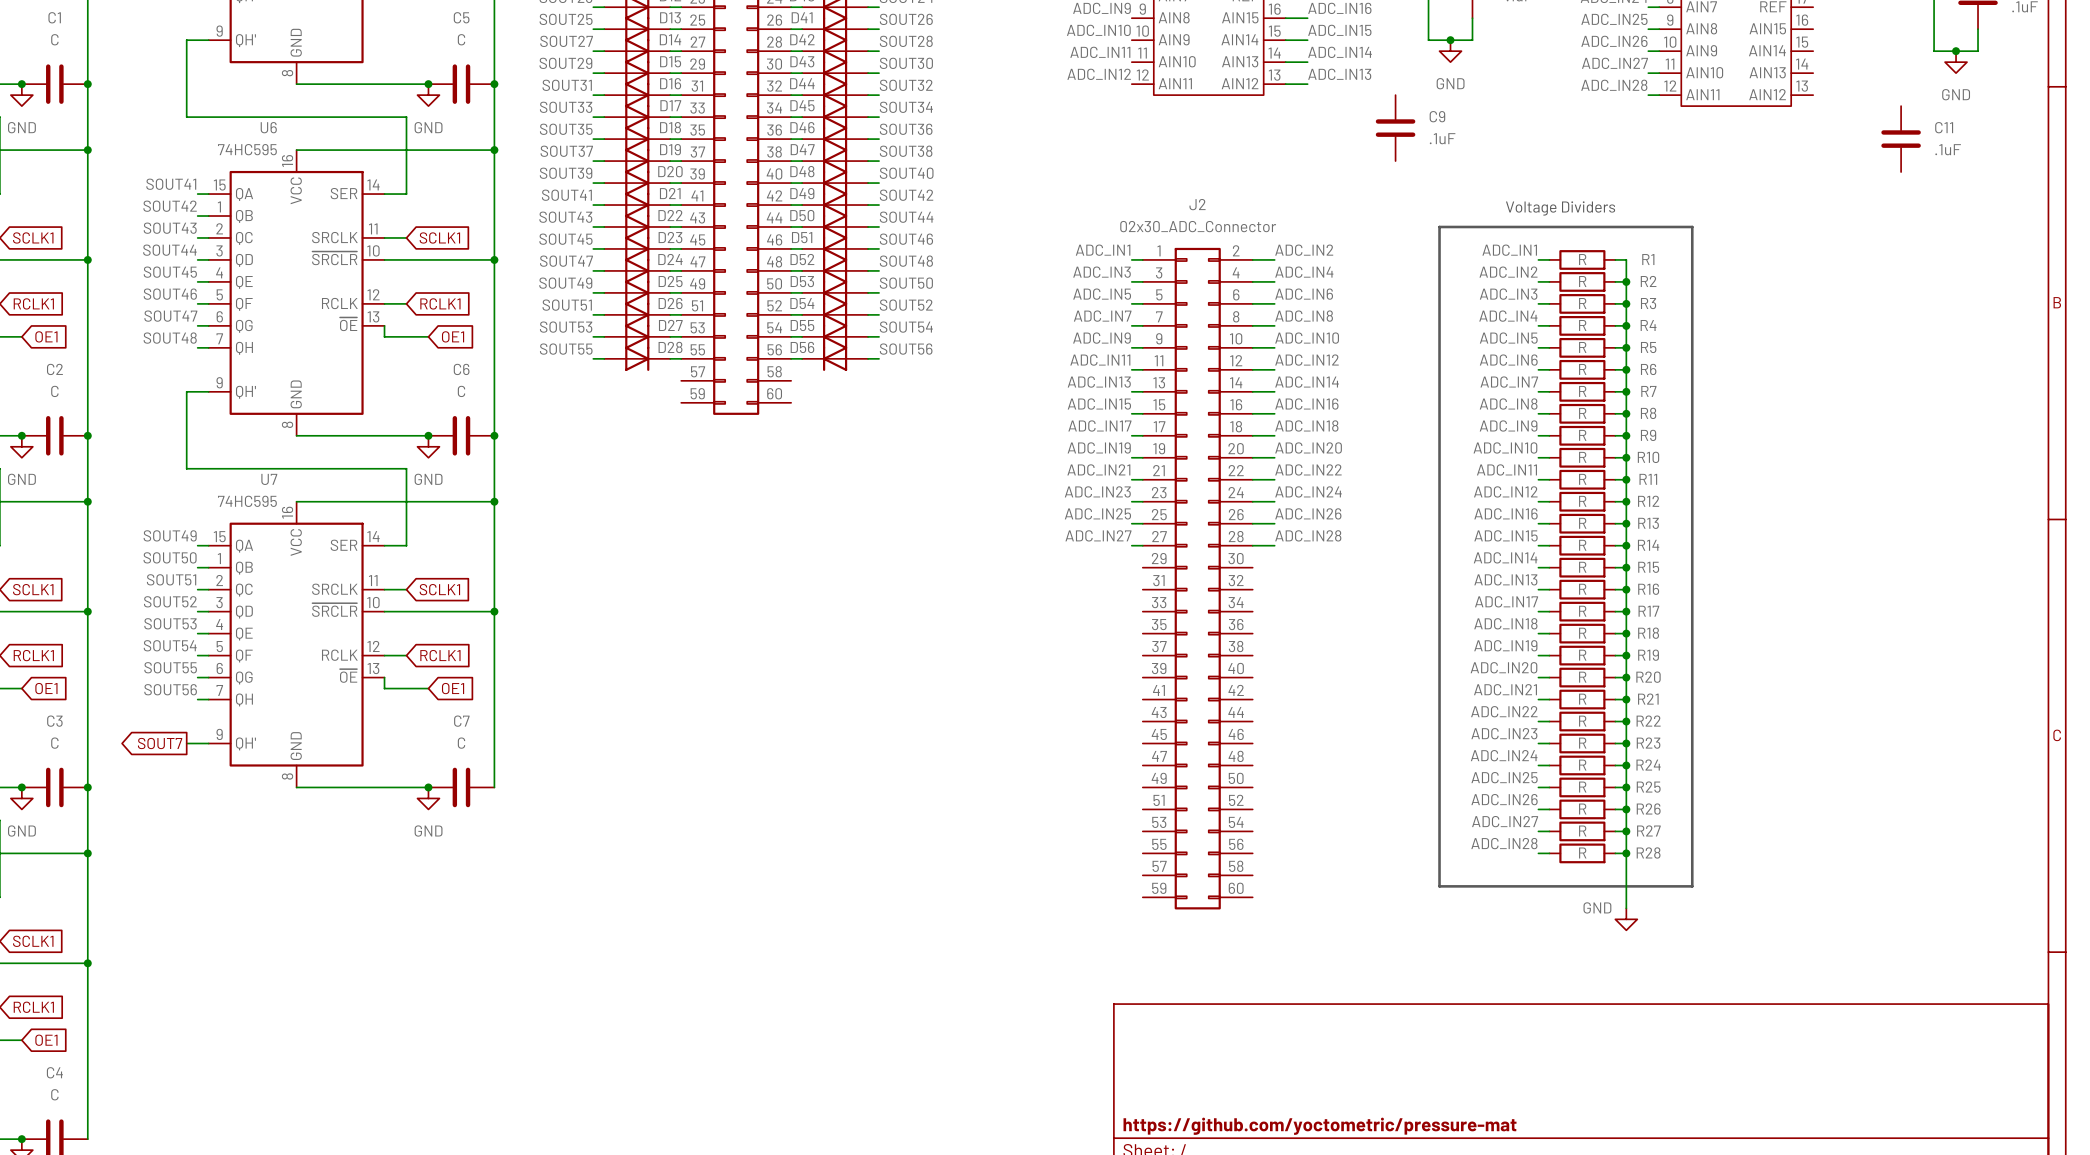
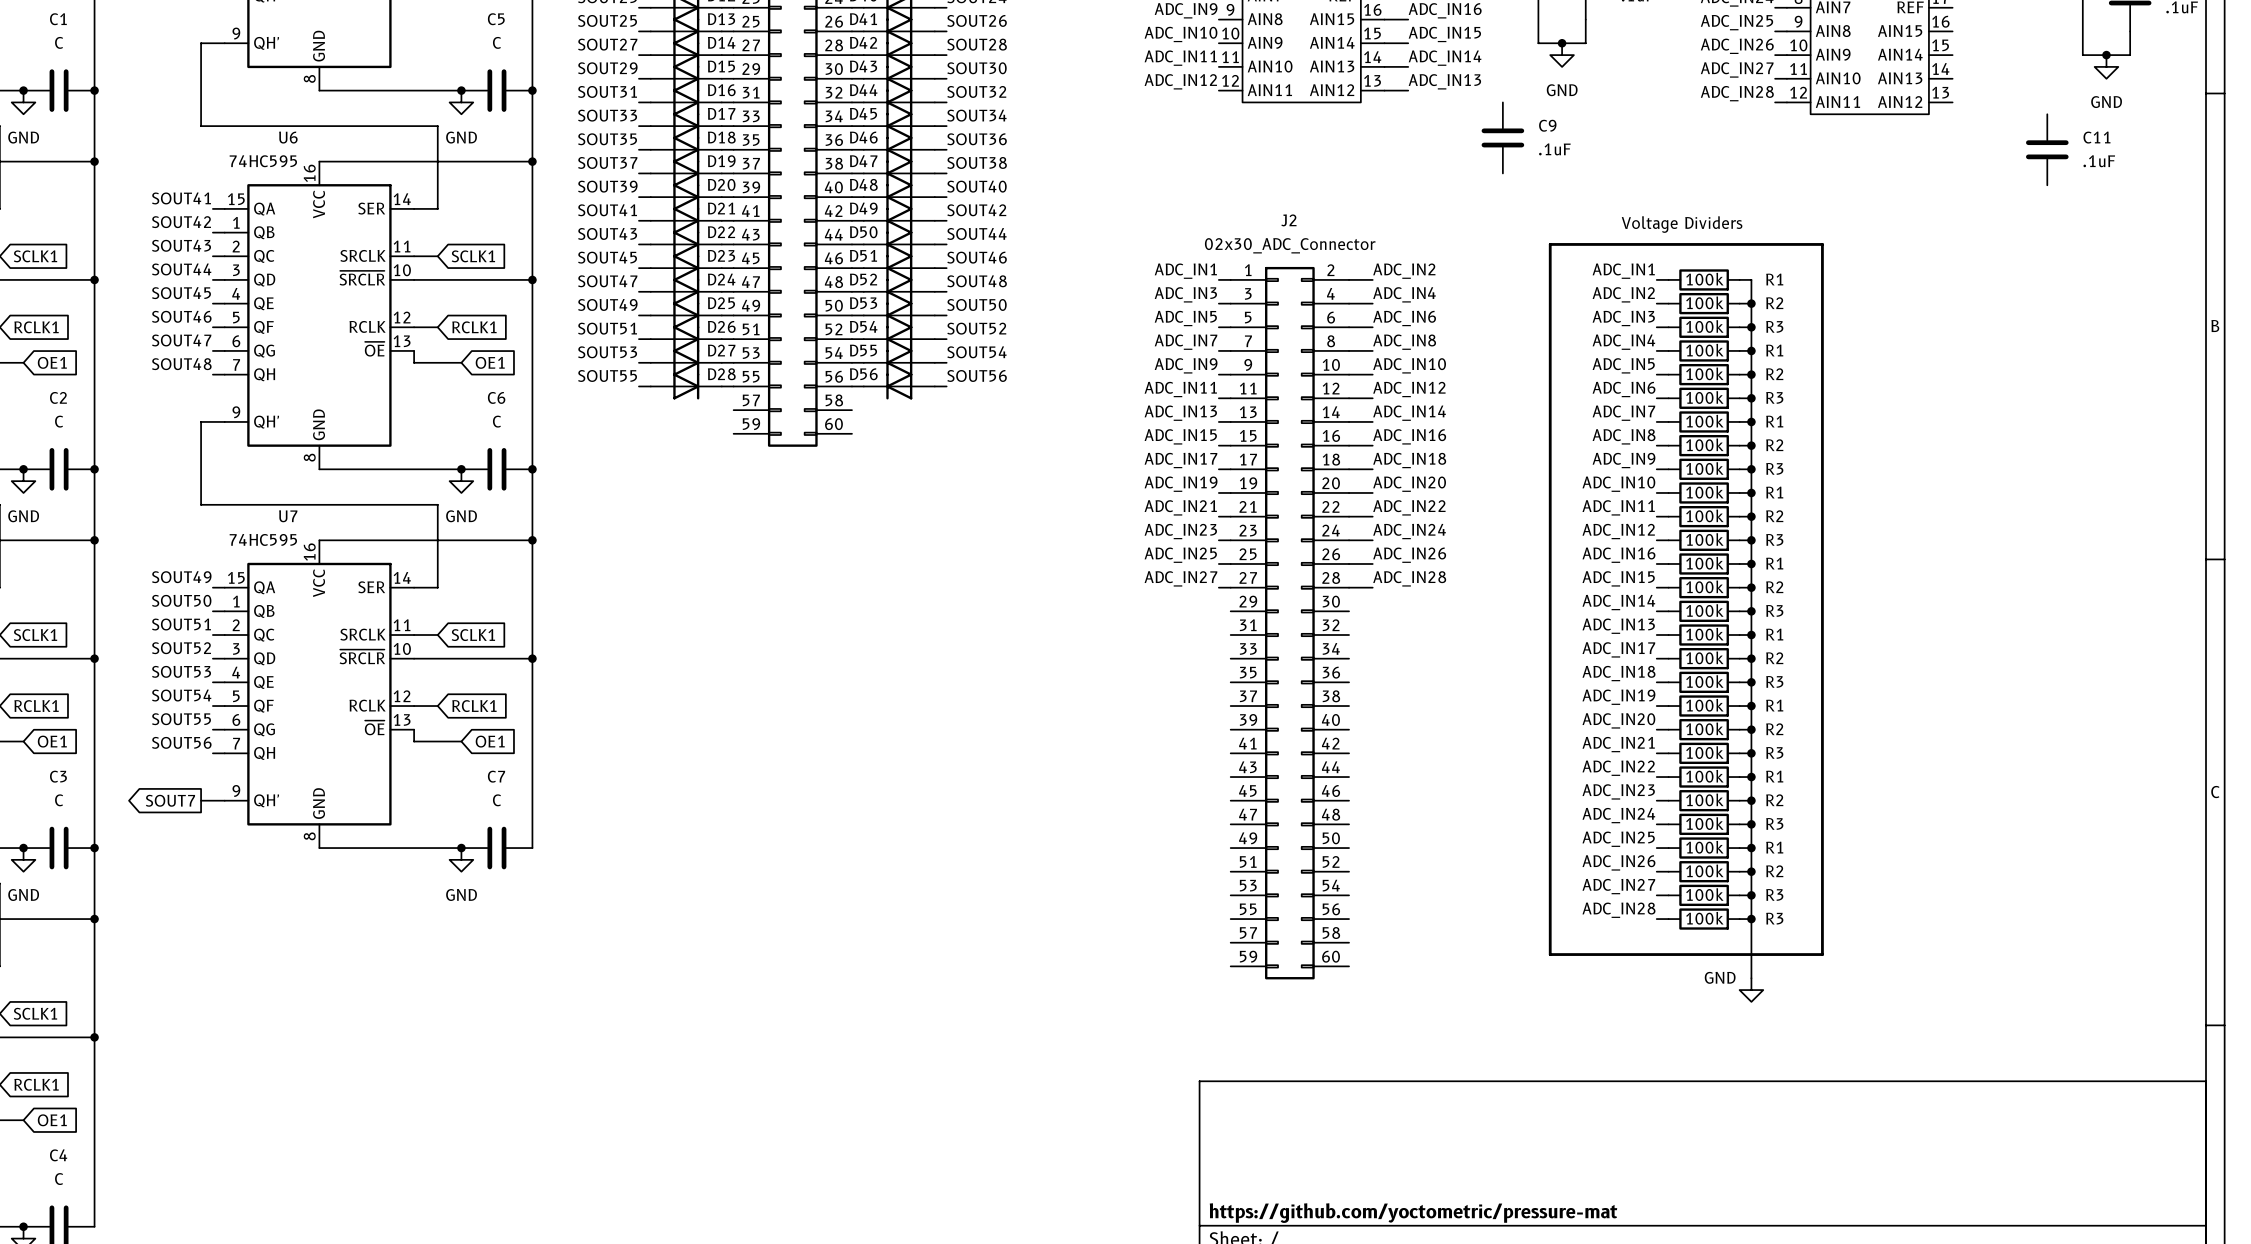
R1 value: R (1582, 259) -> 100k (1704, 279)
R2 value: R (1582, 281) -> 100k (1704, 302)
R3 value: R (1582, 303) -> 100k (1704, 326)
R4 value: R (1582, 325) -> 100k (1704, 350)
R4 name: R4 (1648, 325) -> R1 (1774, 350)
R5 value: R (1582, 347) -> 100k (1704, 373)
R5 name: R5 (1648, 347) -> R2 (1774, 374)
R6 value: R (1582, 369) -> 100k (1704, 397)
R6 name: R6 (1648, 369) -> R3 (1774, 397)
R7 value: R (1582, 391) -> 100k (1704, 421)
R7 name: R7 (1648, 391) -> R1 (1774, 421)
R8 value: R (1582, 413) -> 100k (1704, 444)
R8 name: R8 (1648, 413) -> R2 (1774, 445)
R9 value: R (1582, 435) -> 100k (1704, 468)
R9 name: R9 (1648, 435) -> R3 (1774, 468)
R10 value: R (1582, 457) -> 100k (1704, 492)
R10 name: R10 (1648, 457) -> R1 (1774, 492)
R11 value: R (1582, 479) -> 100k (1704, 515)
R11 name: R11 (1648, 479) -> R2 (1774, 516)
R12 value: R (1582, 501) -> 100k (1704, 539)
R12 name: R12 (1648, 501) -> R3 (1774, 539)
R13 value: R (1582, 523) -> 100k (1704, 563)
R13 name: R13 (1648, 523) -> R1 (1774, 563)
R14 value: R (1582, 545) -> 100k (1704, 586)
R14 name: R14 (1648, 545) -> R2 (1774, 587)
R15 value: R (1582, 567) -> 100k (1704, 610)
R15 name: R15 (1648, 567) -> R3 (1774, 610)
R16 value: R (1582, 589) -> 100k (1704, 634)
R16 name: R16 (1648, 589) -> R1 (1774, 634)
R17 value: R (1582, 611) -> 100k (1704, 657)
R17 name: R17 (1648, 611) -> R2 (1774, 658)
R18 value: R (1582, 633) -> 100k (1704, 681)
R18 name: R18 (1648, 633) -> R3 (1774, 681)
R19 value: R (1582, 655) -> 100k (1704, 705)
R19 name: R19 (1648, 655) -> R1 (1774, 705)
R20 value: R (1582, 677) -> 100k (1704, 728)
R20 name: R20 (1648, 677) -> R2 (1774, 729)
R21 value: R (1582, 699) -> 100k (1704, 752)
R21 name: R21 (1648, 699) -> R3 (1774, 752)
R22 value: R (1582, 721) -> 100k (1704, 776)
R22 name: R22 (1648, 721) -> R1 (1774, 776)
R23 value: R (1582, 743) -> 100k (1704, 799)
R23 name: R23 (1648, 743) -> R2 (1774, 800)
R24 value: R (1582, 765) -> 100k (1704, 823)
R24 name: R24 (1648, 765) -> R3 (1774, 823)
R25 value: R (1582, 787) -> 100k (1704, 847)
R25 name: R25 (1648, 787) -> R1 (1774, 847)
R26 value: R (1582, 809) -> 100k (1704, 870)
R26 name: R26 (1648, 809) -> R2 (1774, 871)
R27 name: R27 (1648, 830) -> R3 (1774, 894)
R27 value: R (1582, 831) -> 100k (1704, 894)
R28 value: R (1582, 852) -> 100k (1704, 918)
R28 name: R28 (1648, 852) -> R3 (1774, 918)

